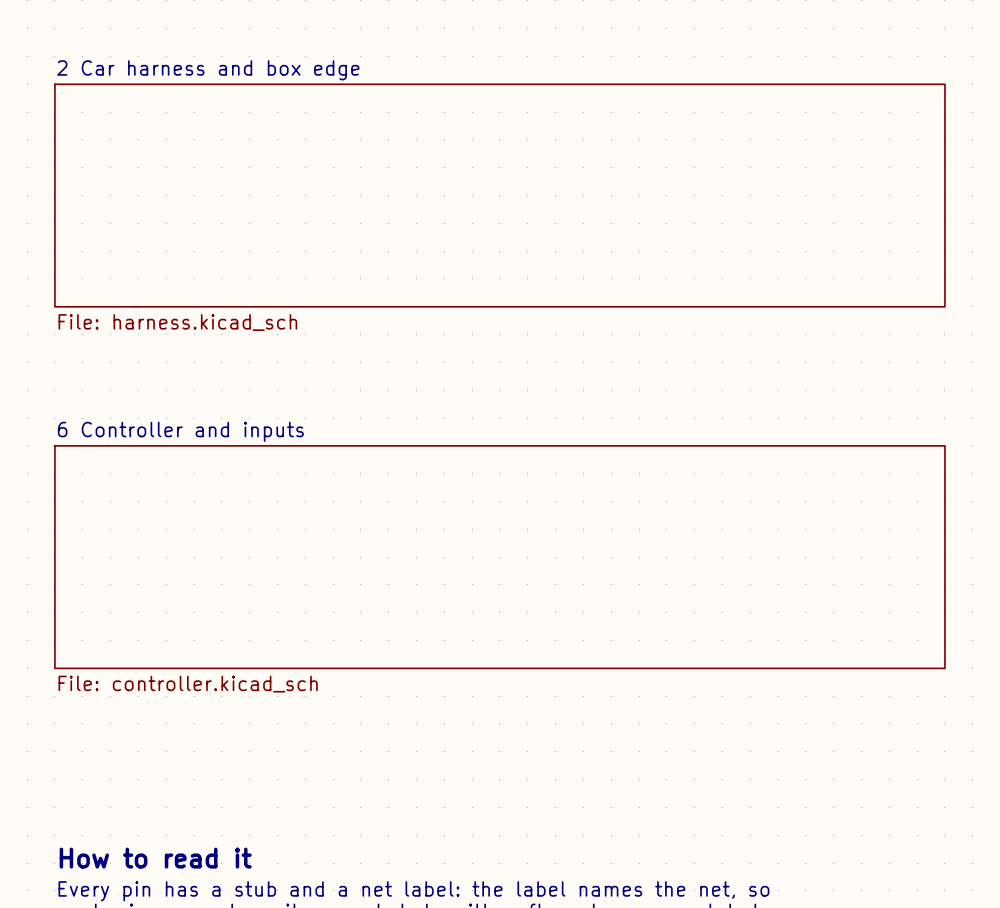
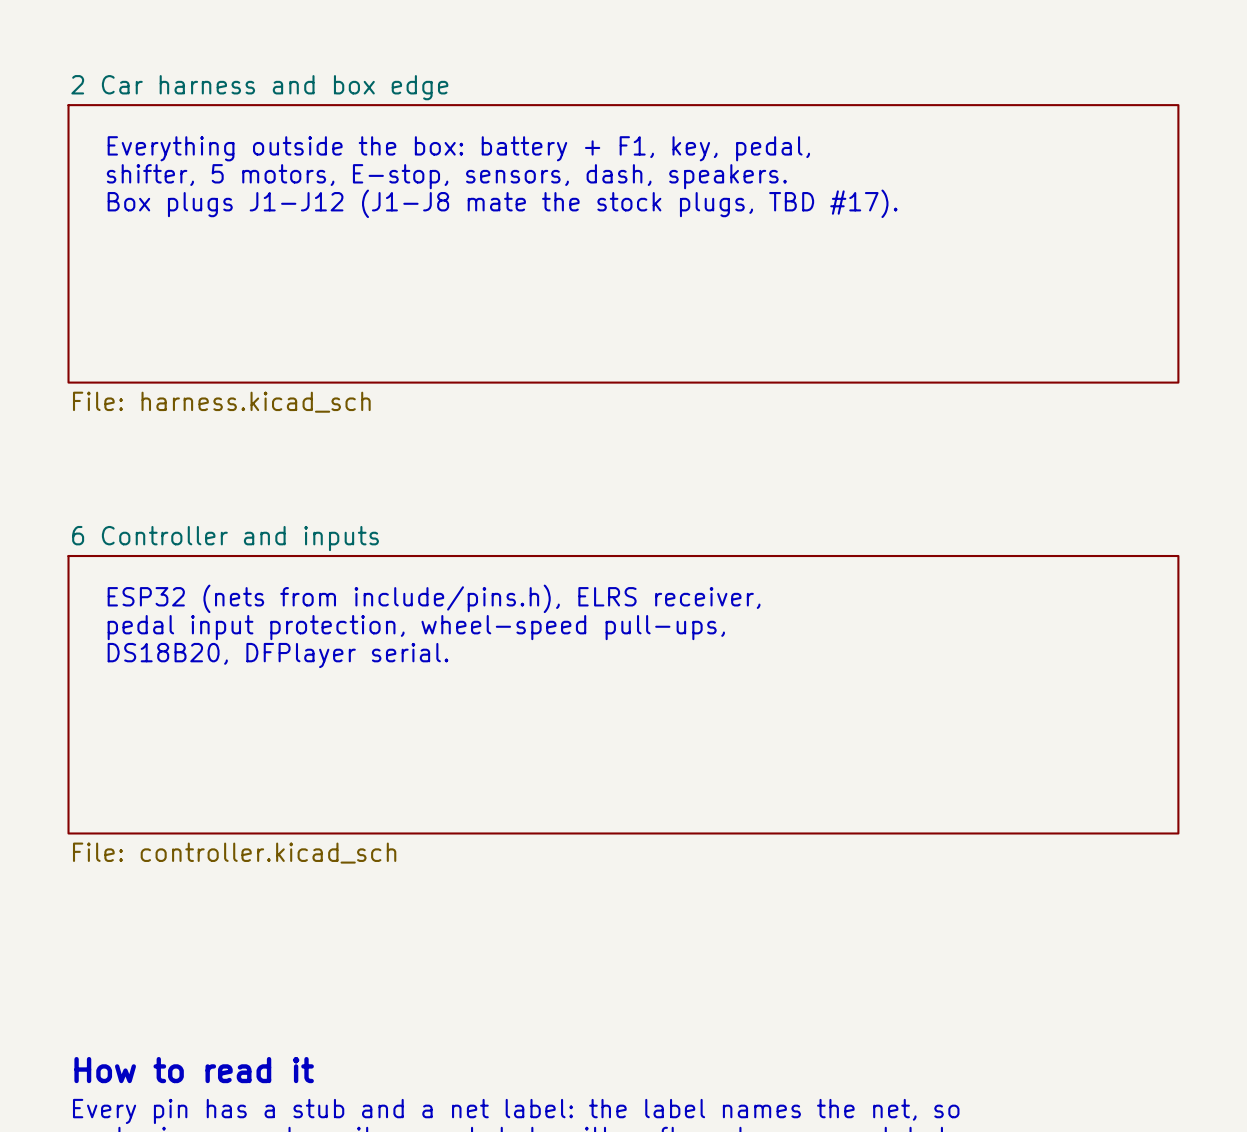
text: none -> Everything outside the box: battery + F1, key, pedal, (458, 148)
text: none -> shifter, 5 motors, E-stop, sensors, dash, speakers. (446, 176)
text: none -> Box plugs J1-J12 (J1-J8 mate the stock plugs, TBD #17). (502, 203)
text: none -> ESP32 (nets from include/pins.h), ELRS receiver, (434, 598)
text: none -> pedal input protection, wheel-speed pull-ups, (416, 627)
text: none -> DS18B20, DFPlayer serial. (277, 655)

